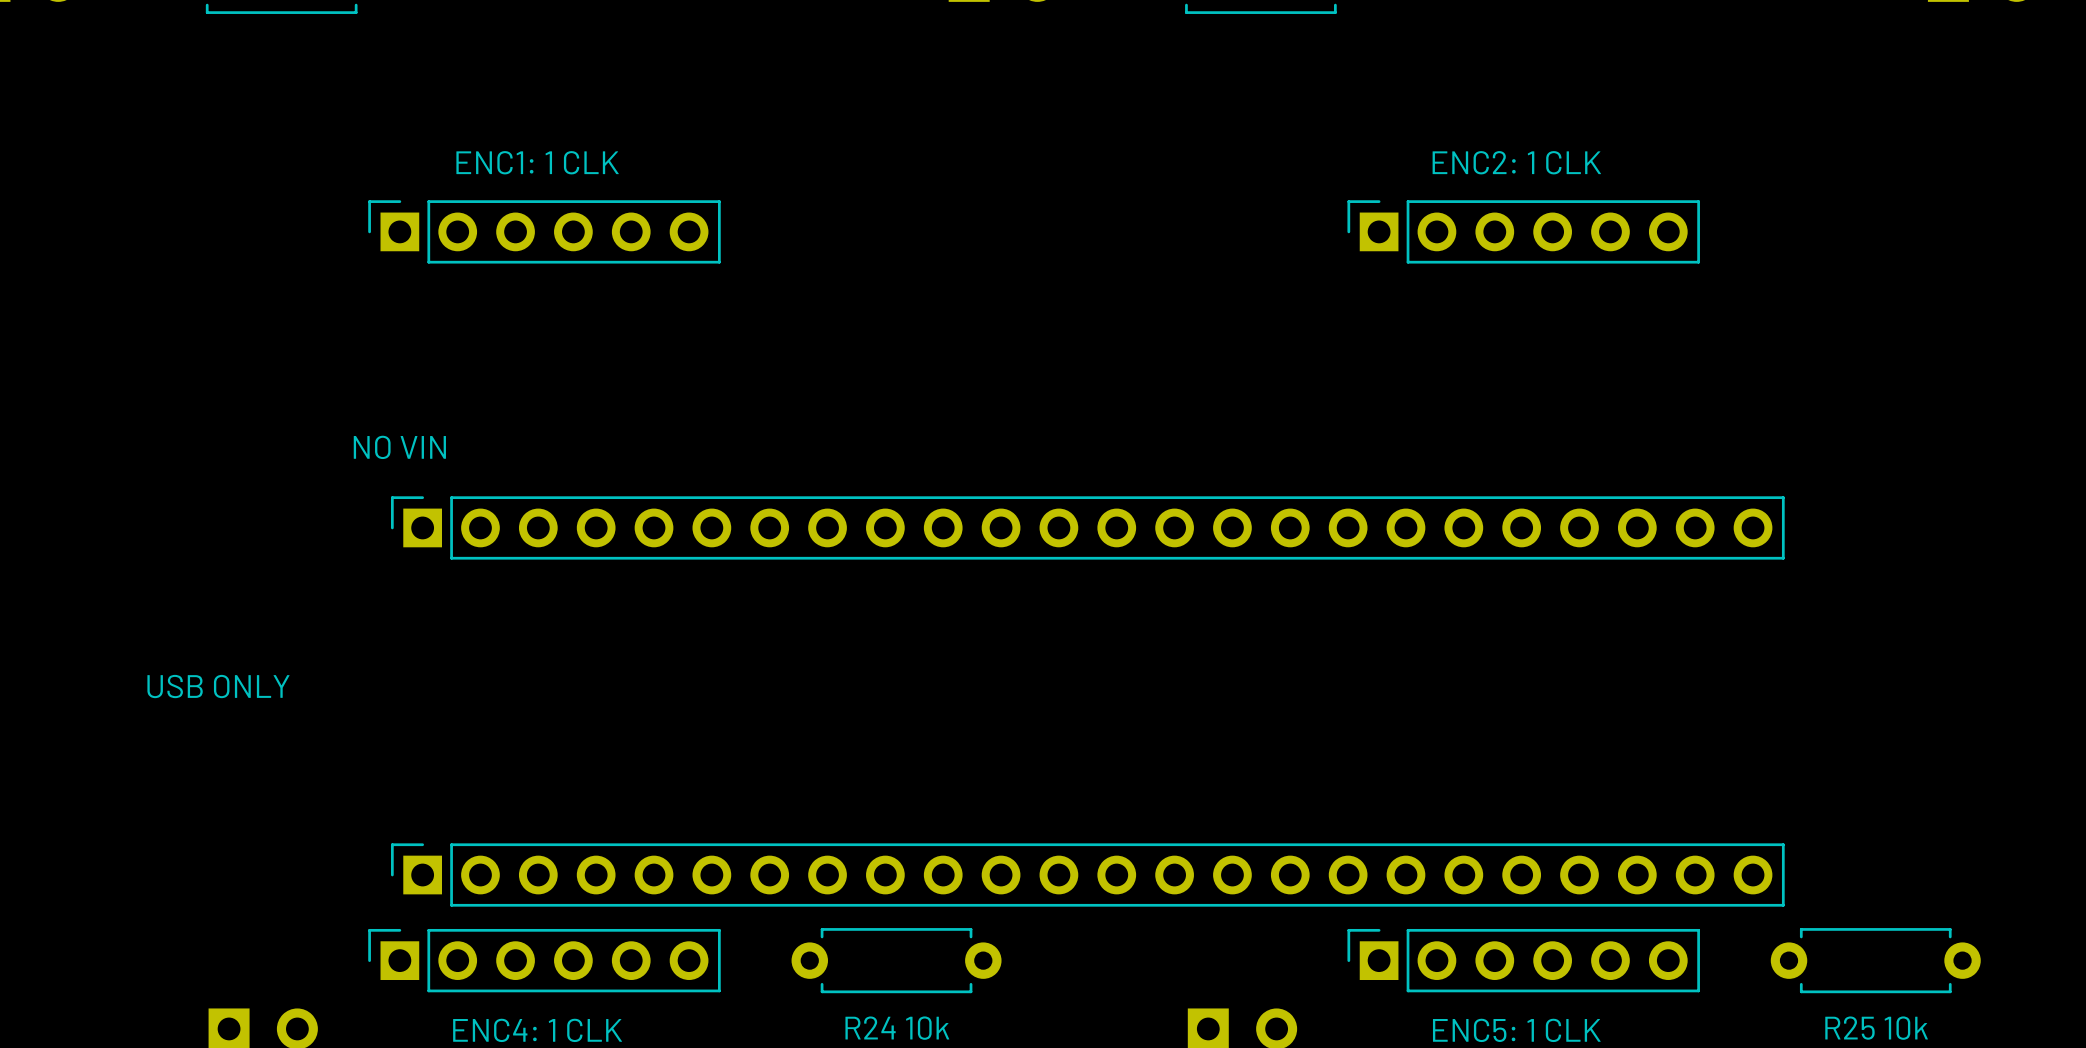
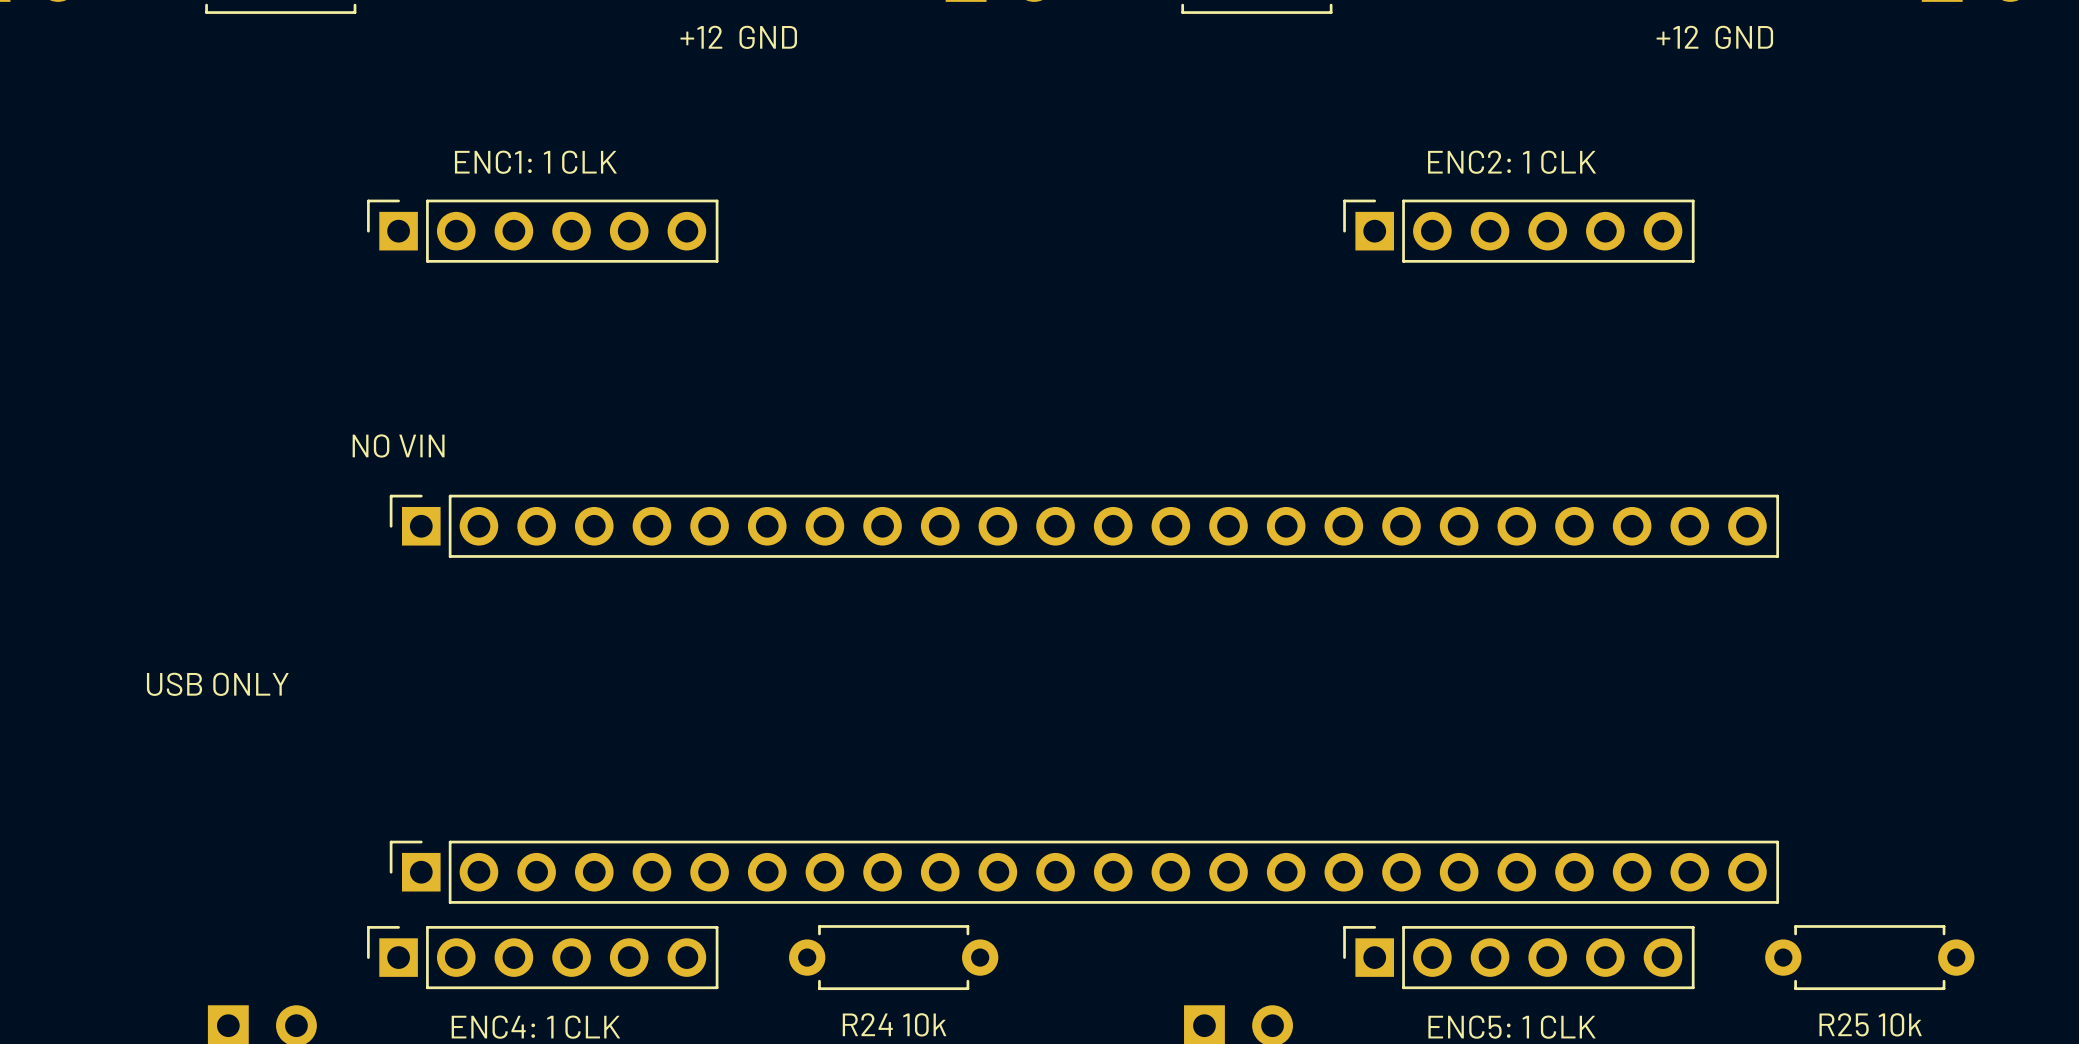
text: none -> +12 GND (738, 37)
text: none -> +12 GND (1714, 37)

